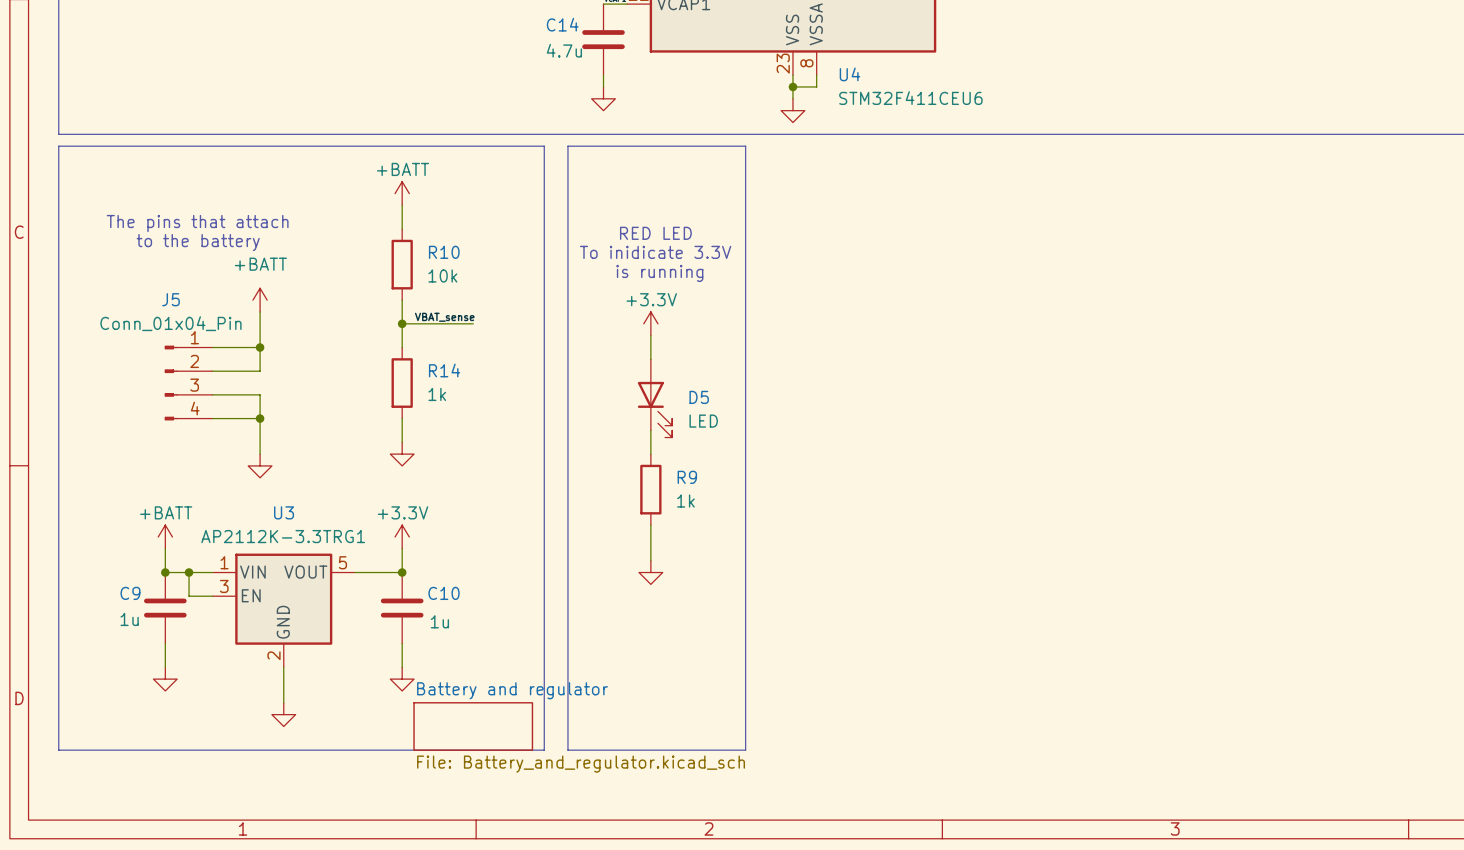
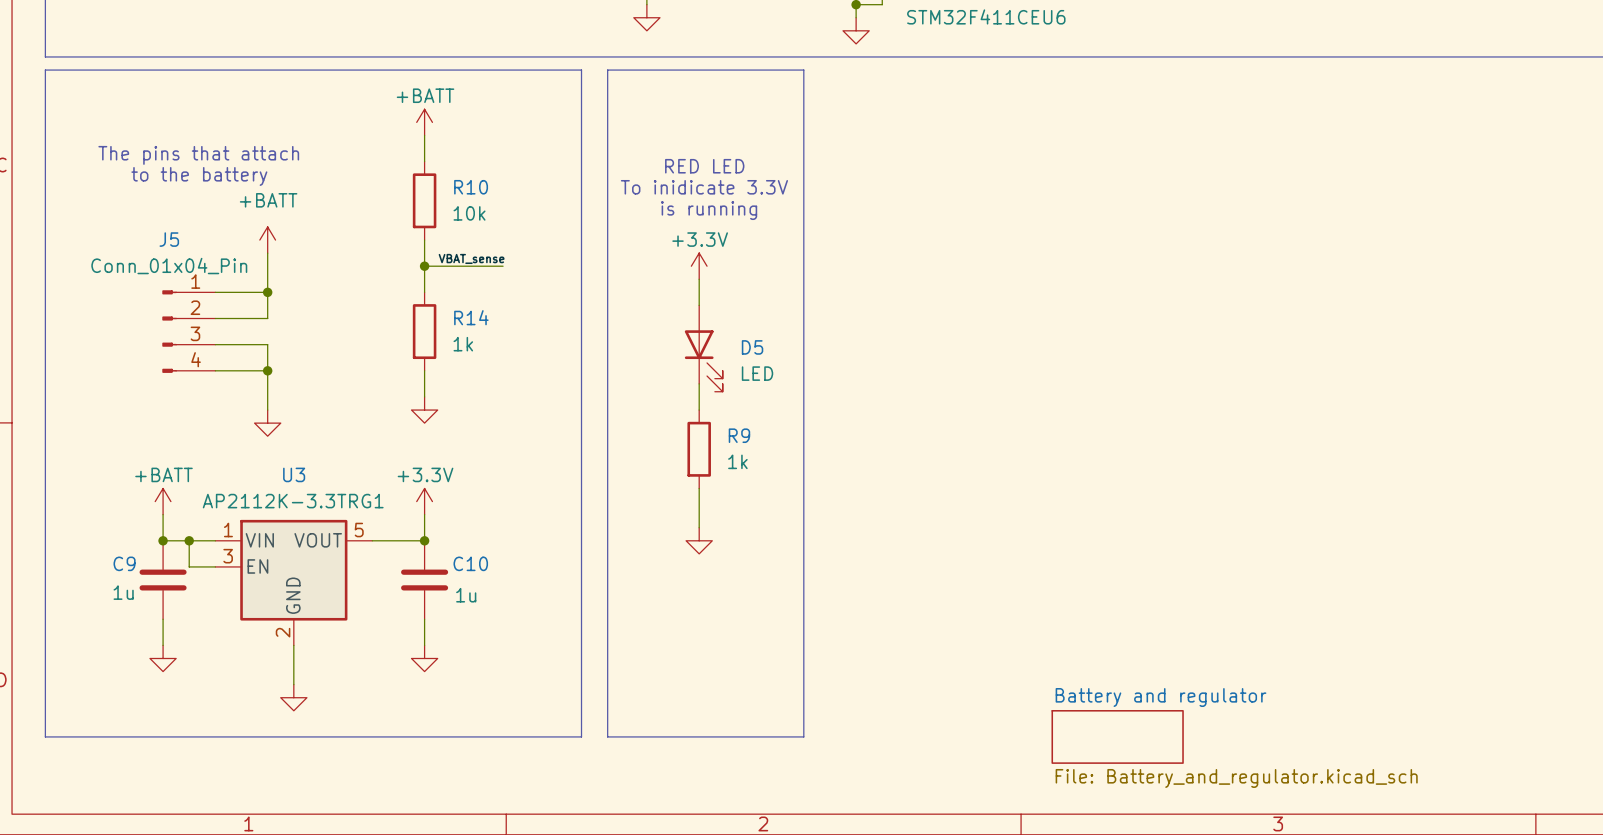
sheet Battery and regulator: File: Battery_and_regulator.kicad_sch (473, 726) -> none
sheet Battery and regulator: none -> File: Battery_and_regulator.kicad_sch (1117, 736)

